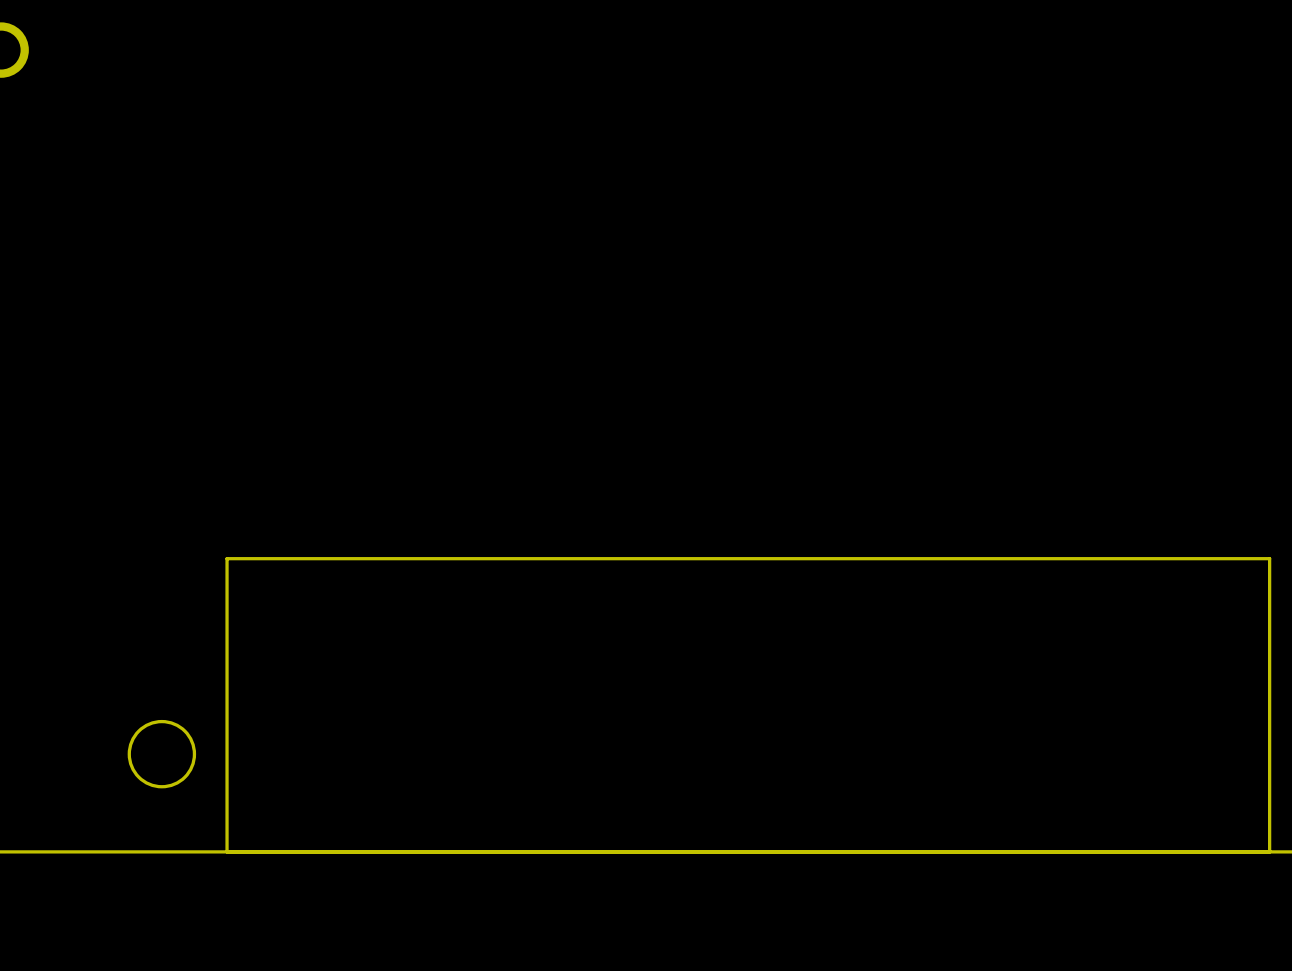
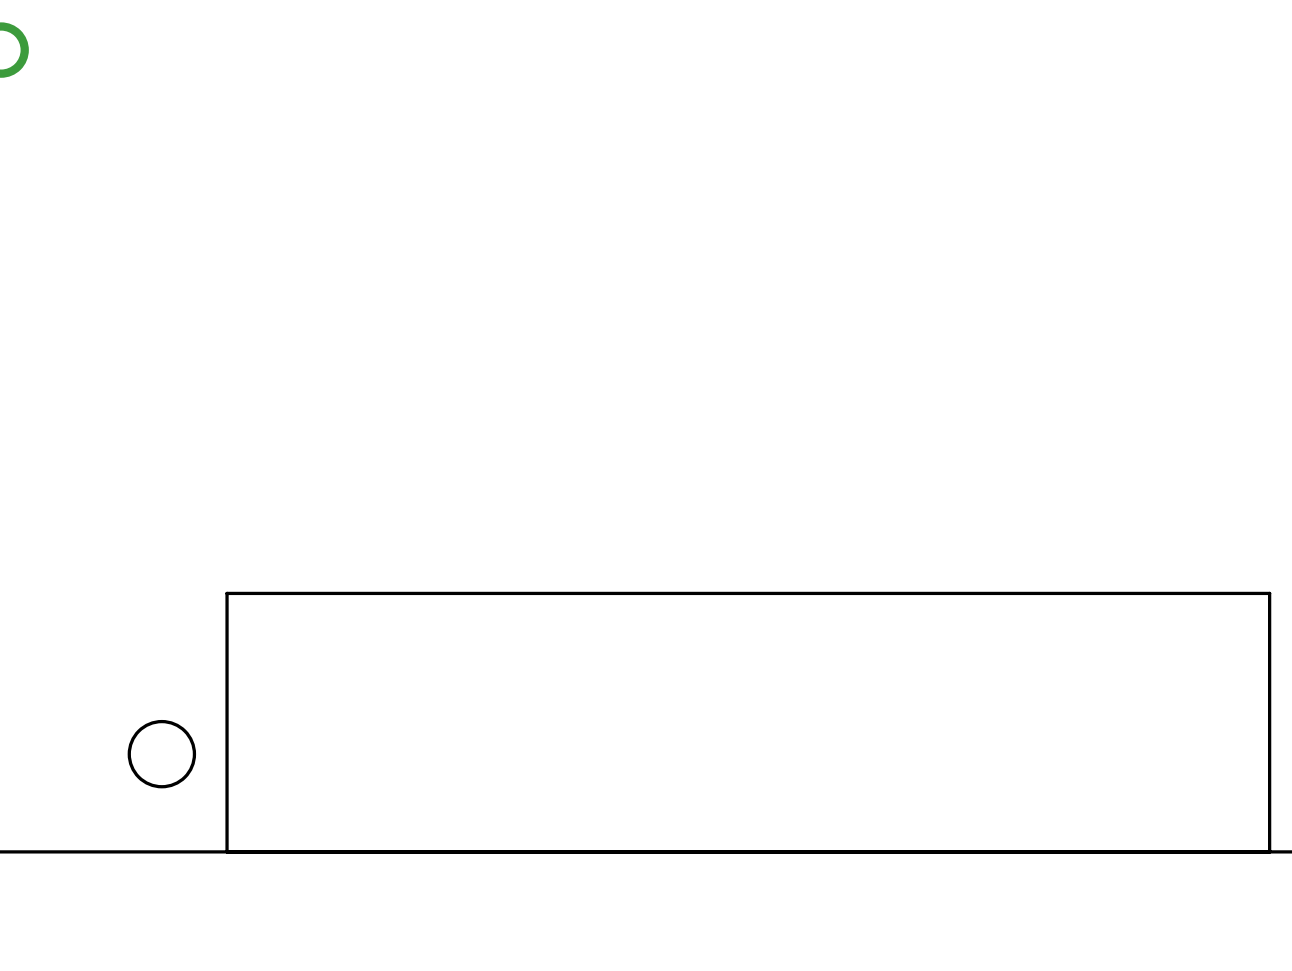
board edge: (1269, 593) (1269, 558) (227, 558) (227, 593) -> (1269, 593) (227, 593)

